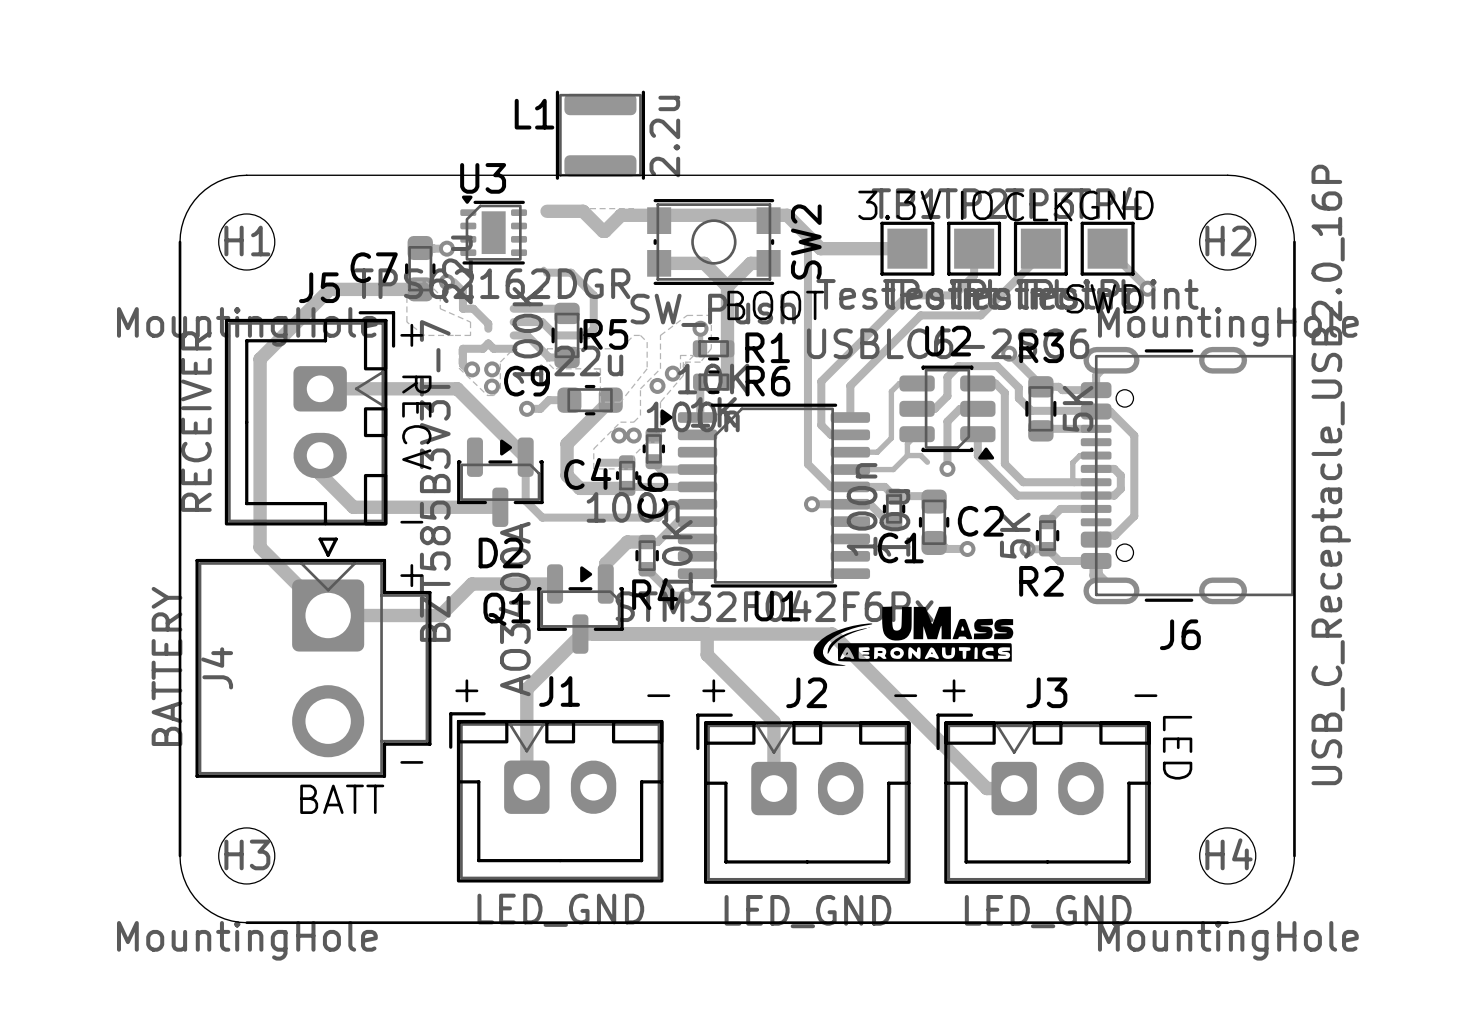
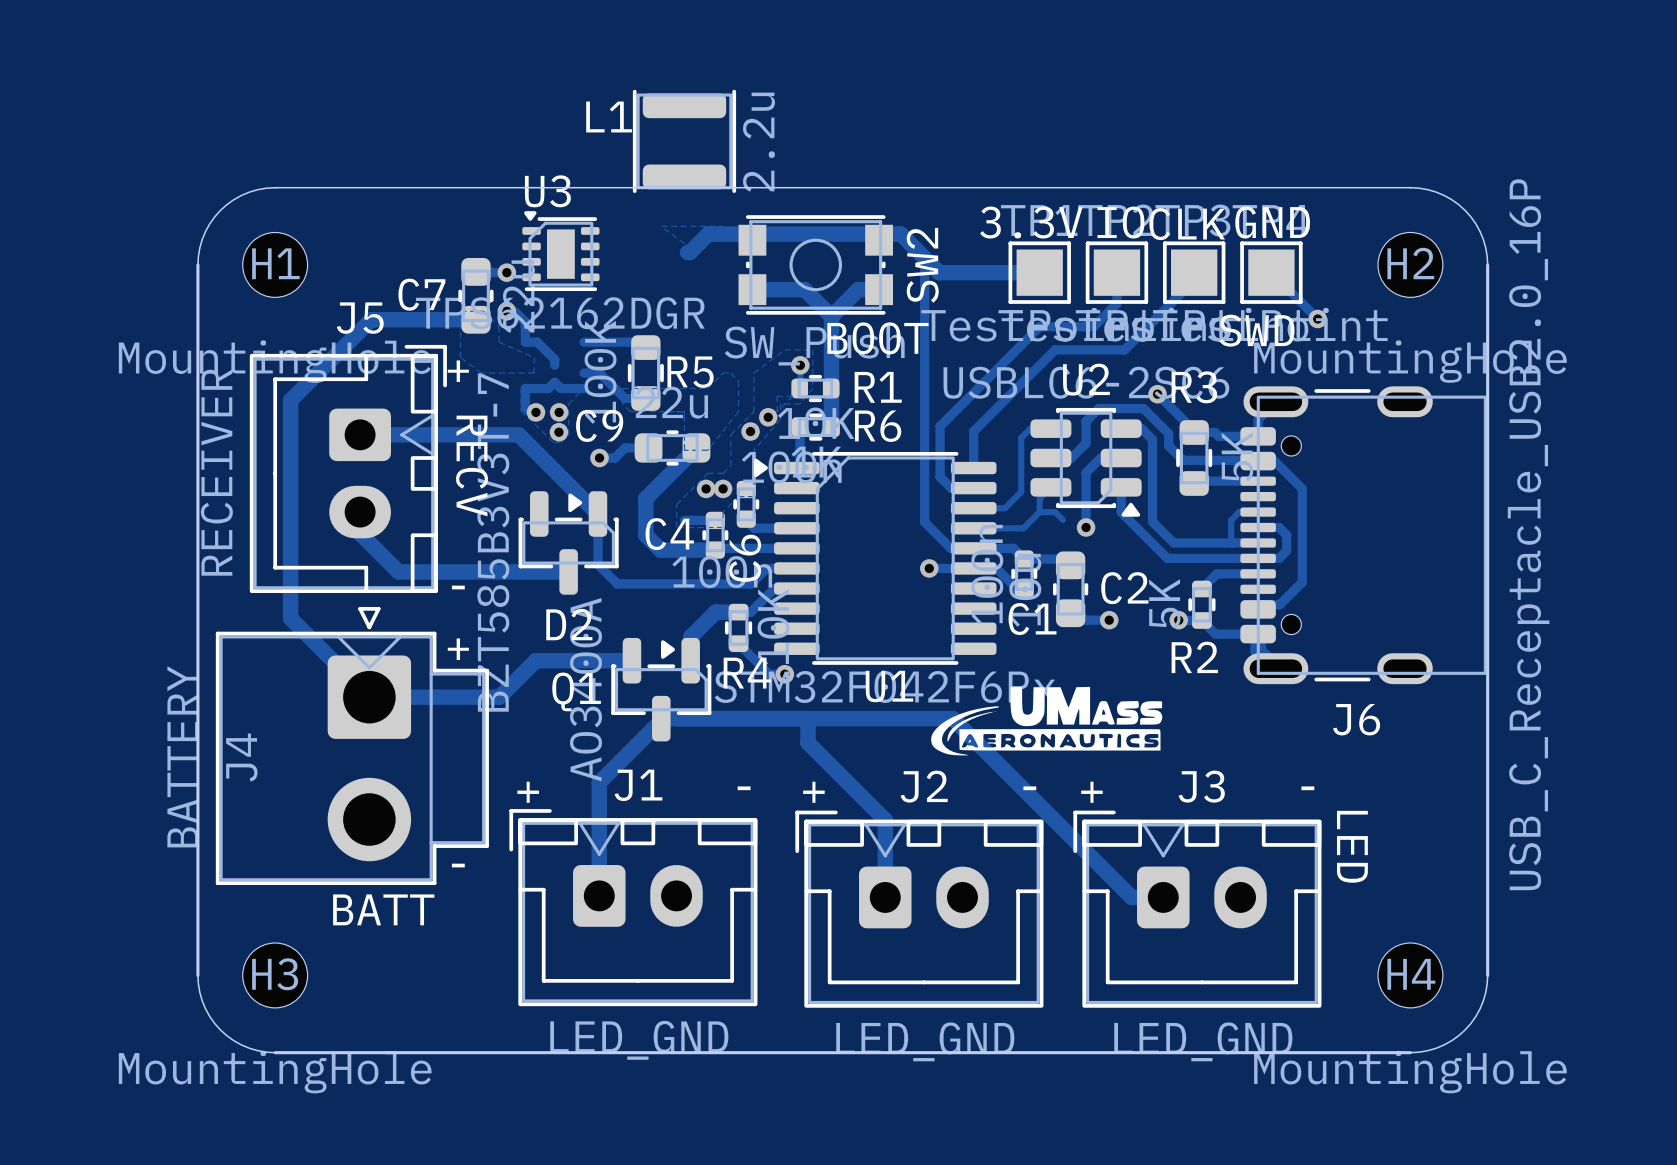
track: (547, 211) (583, 211) (603, 231) -> none
track: (543, 269) (547, 272) (571, 272) (593, 295) (593, 328) (587, 335) (555, 335) (542, 322) (513, 322) -> none

